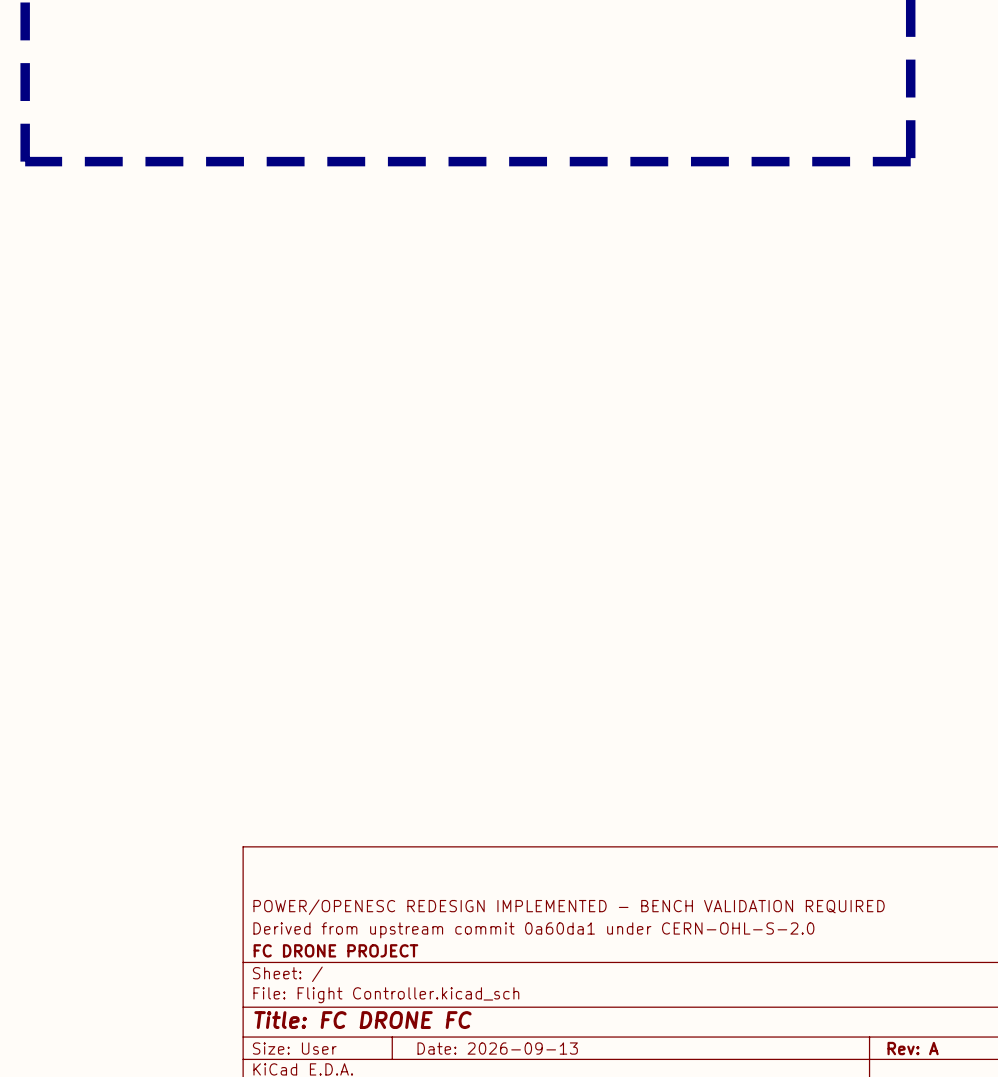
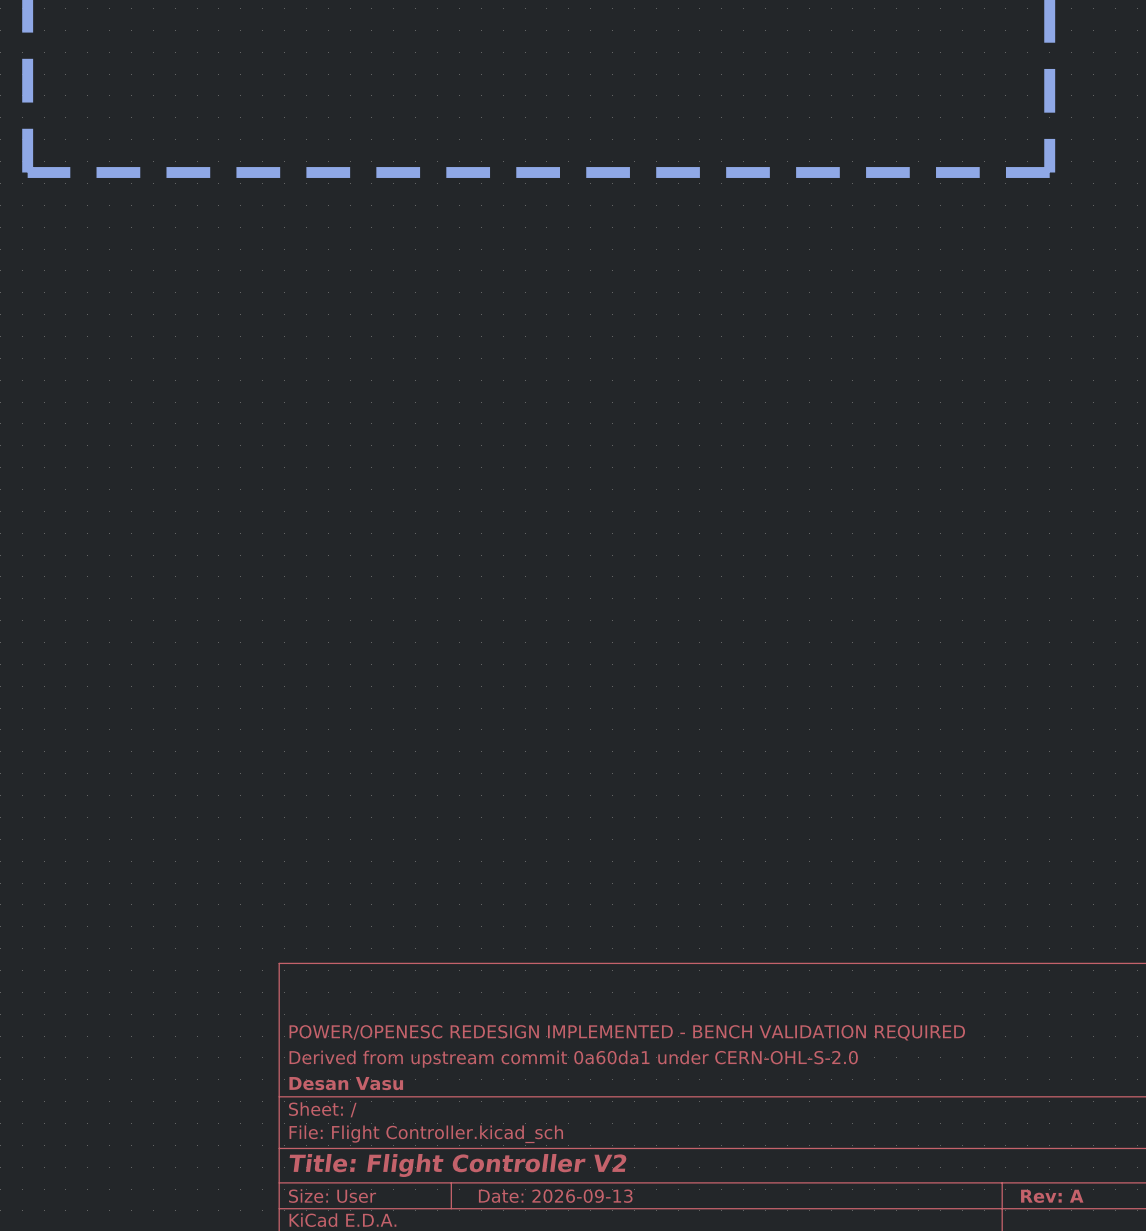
title block: FC DRONE PROJECT (335, 950) -> Desan Vasu (346, 1083)
title block: Title: FC DRONE FC (362, 1020) -> Title: Flight Controller V2 (458, 1165)

